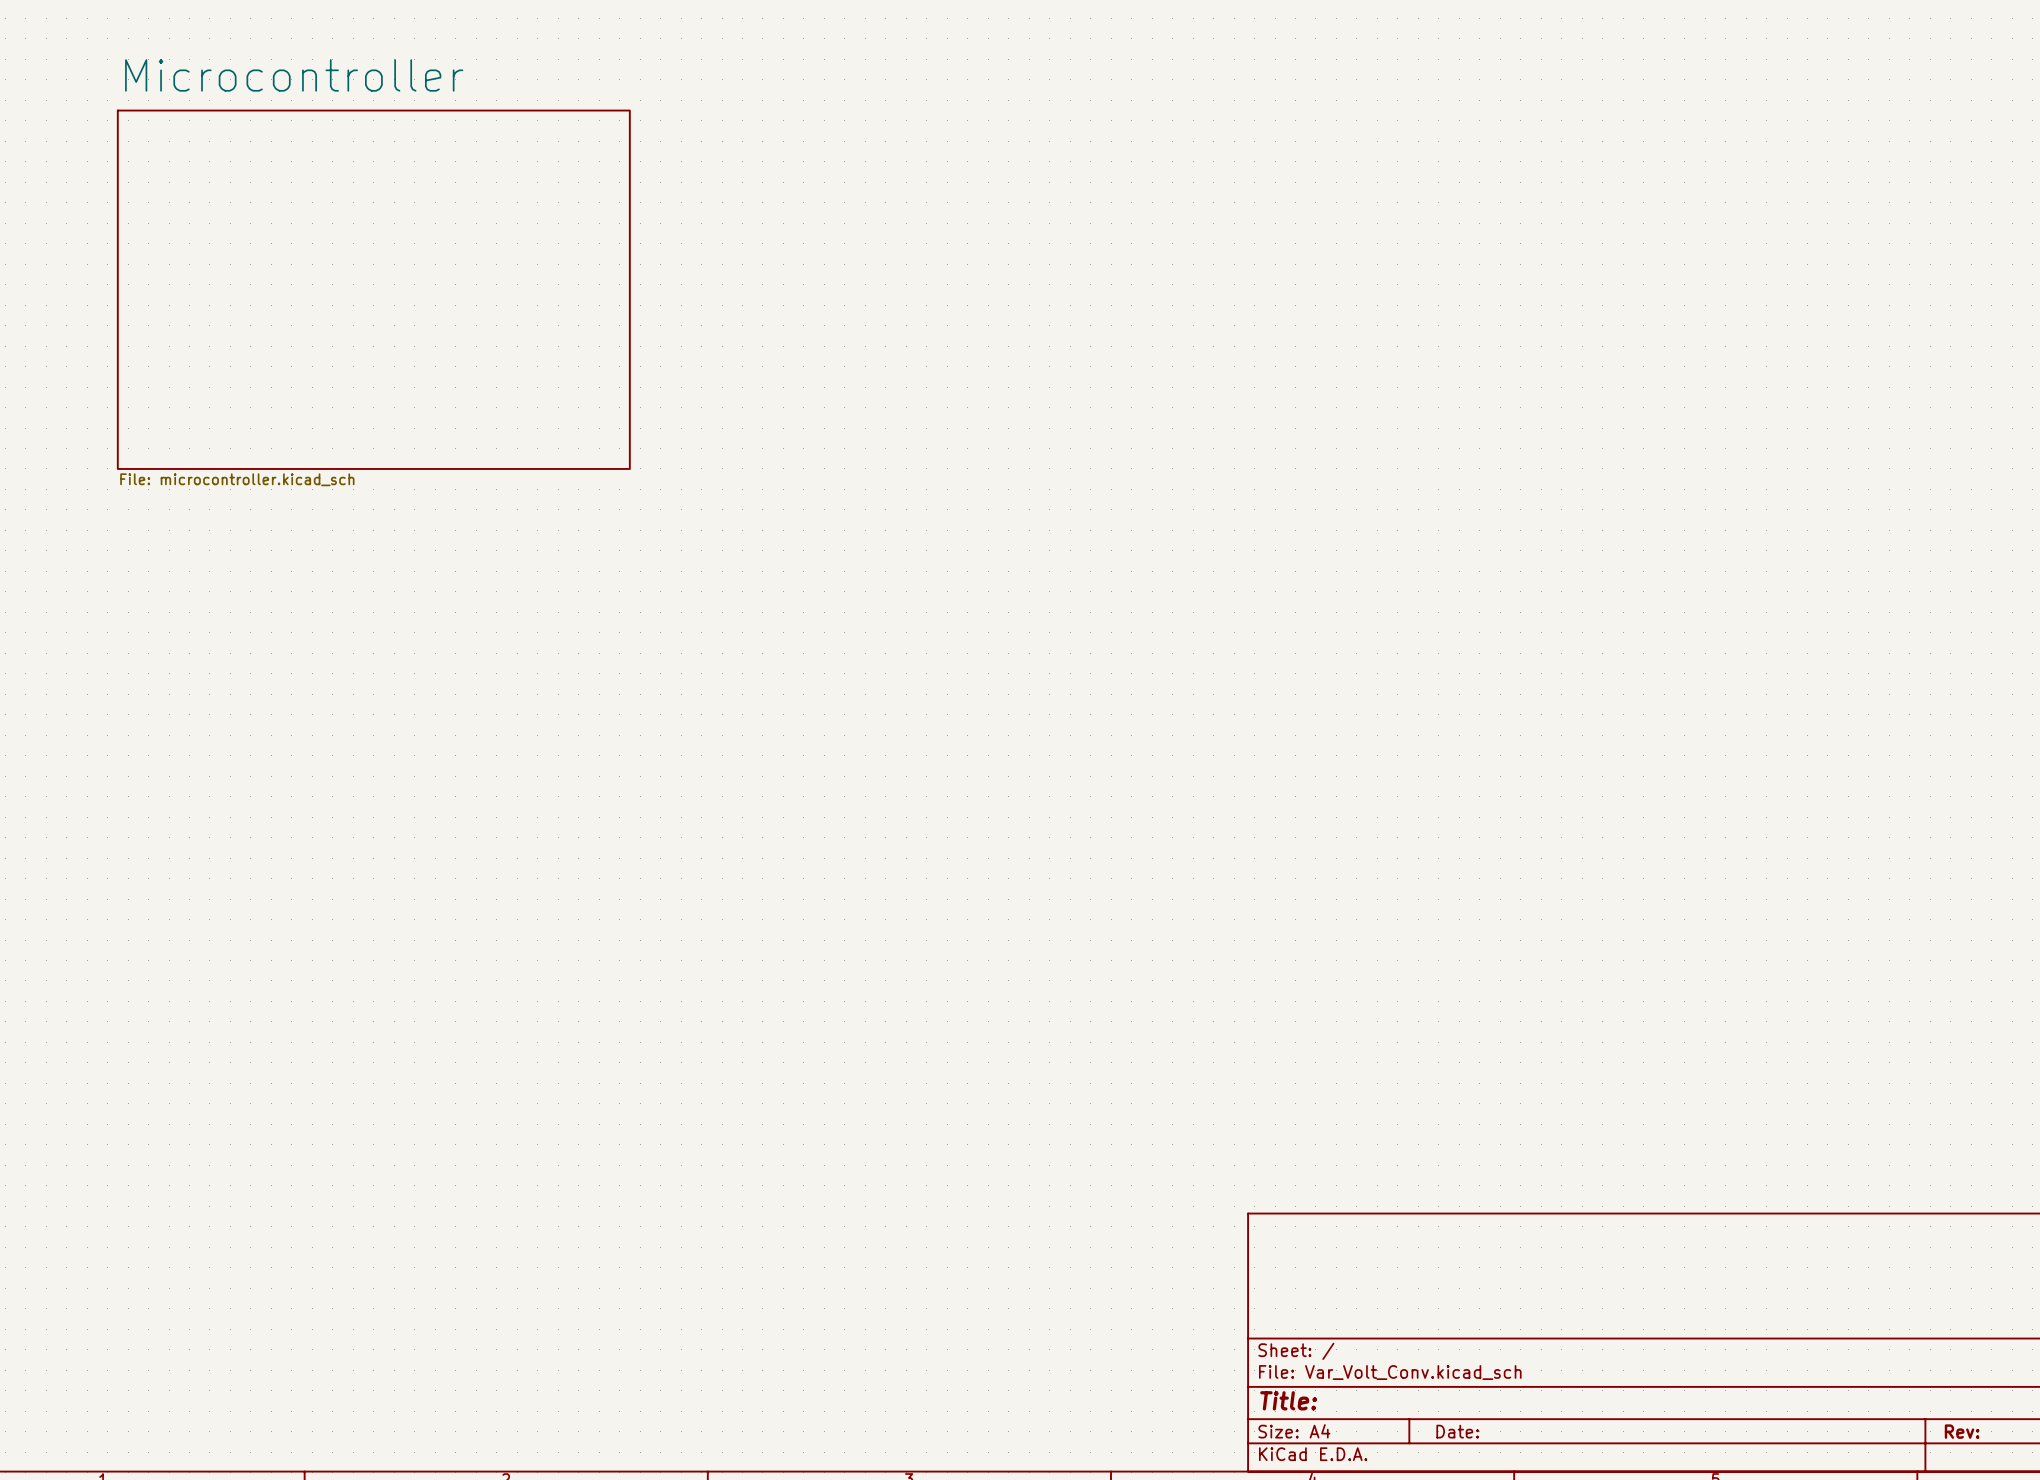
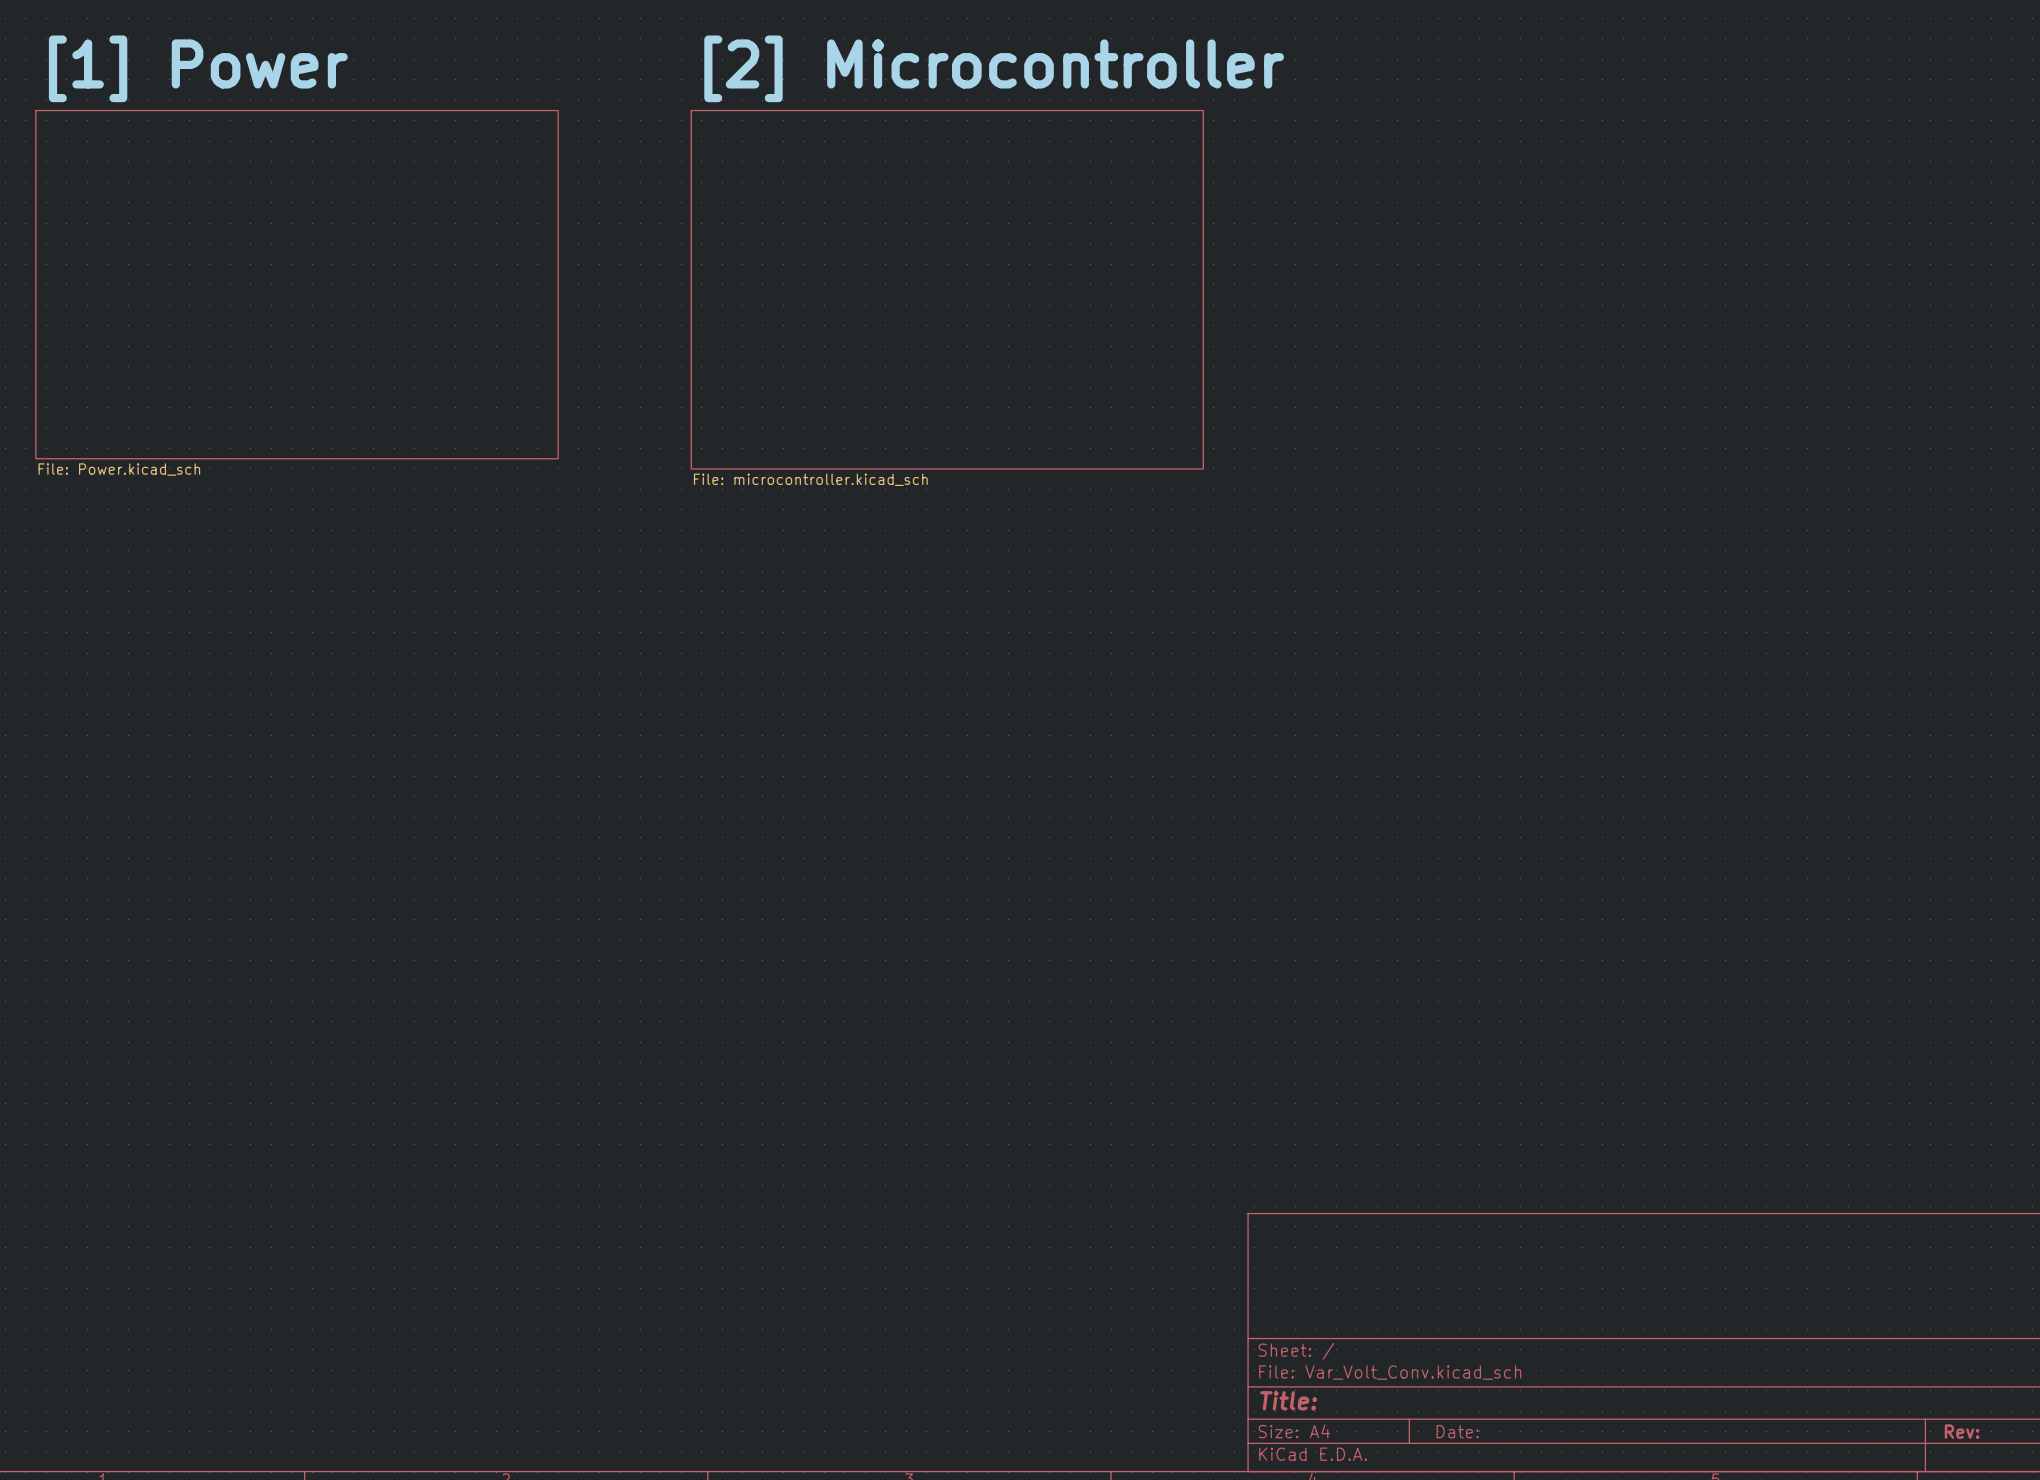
sheet [1] Power: none -> File: Power.kicad_sch (297, 284)
sheet Microcontroller: File: microcontroller.kicad_sch (373, 289) -> none
sheet [2] Microcontroller: none -> File: microcontroller.kicad_sch (947, 289)

